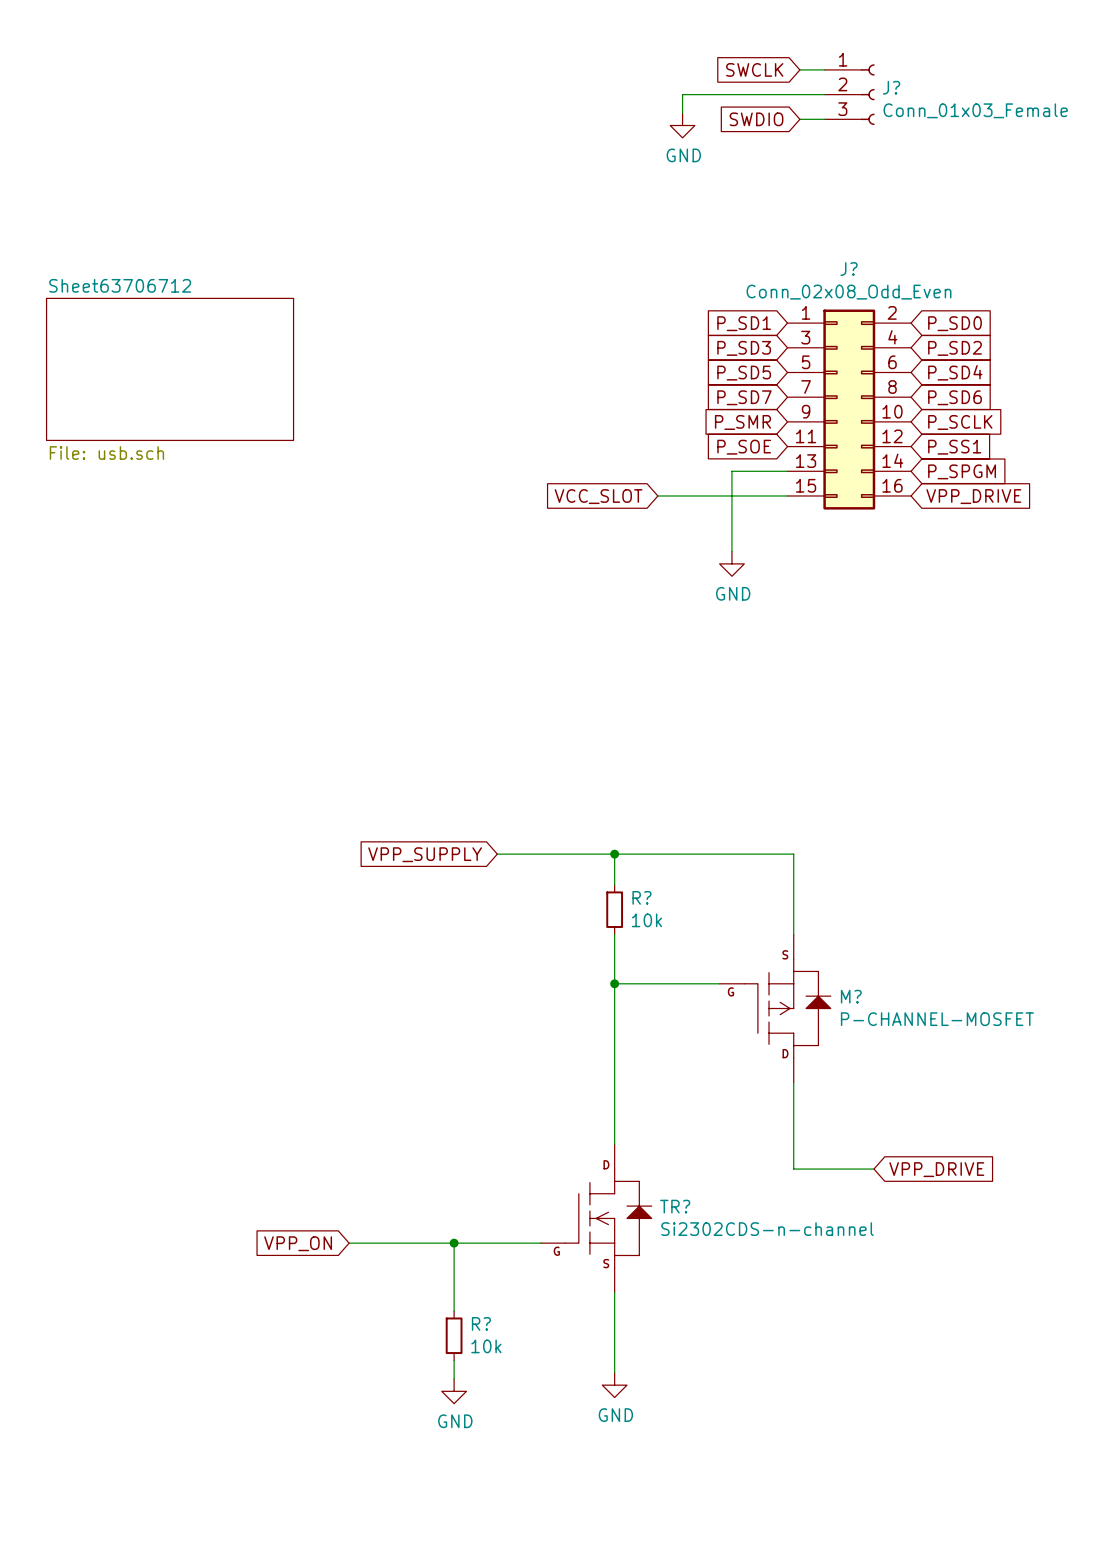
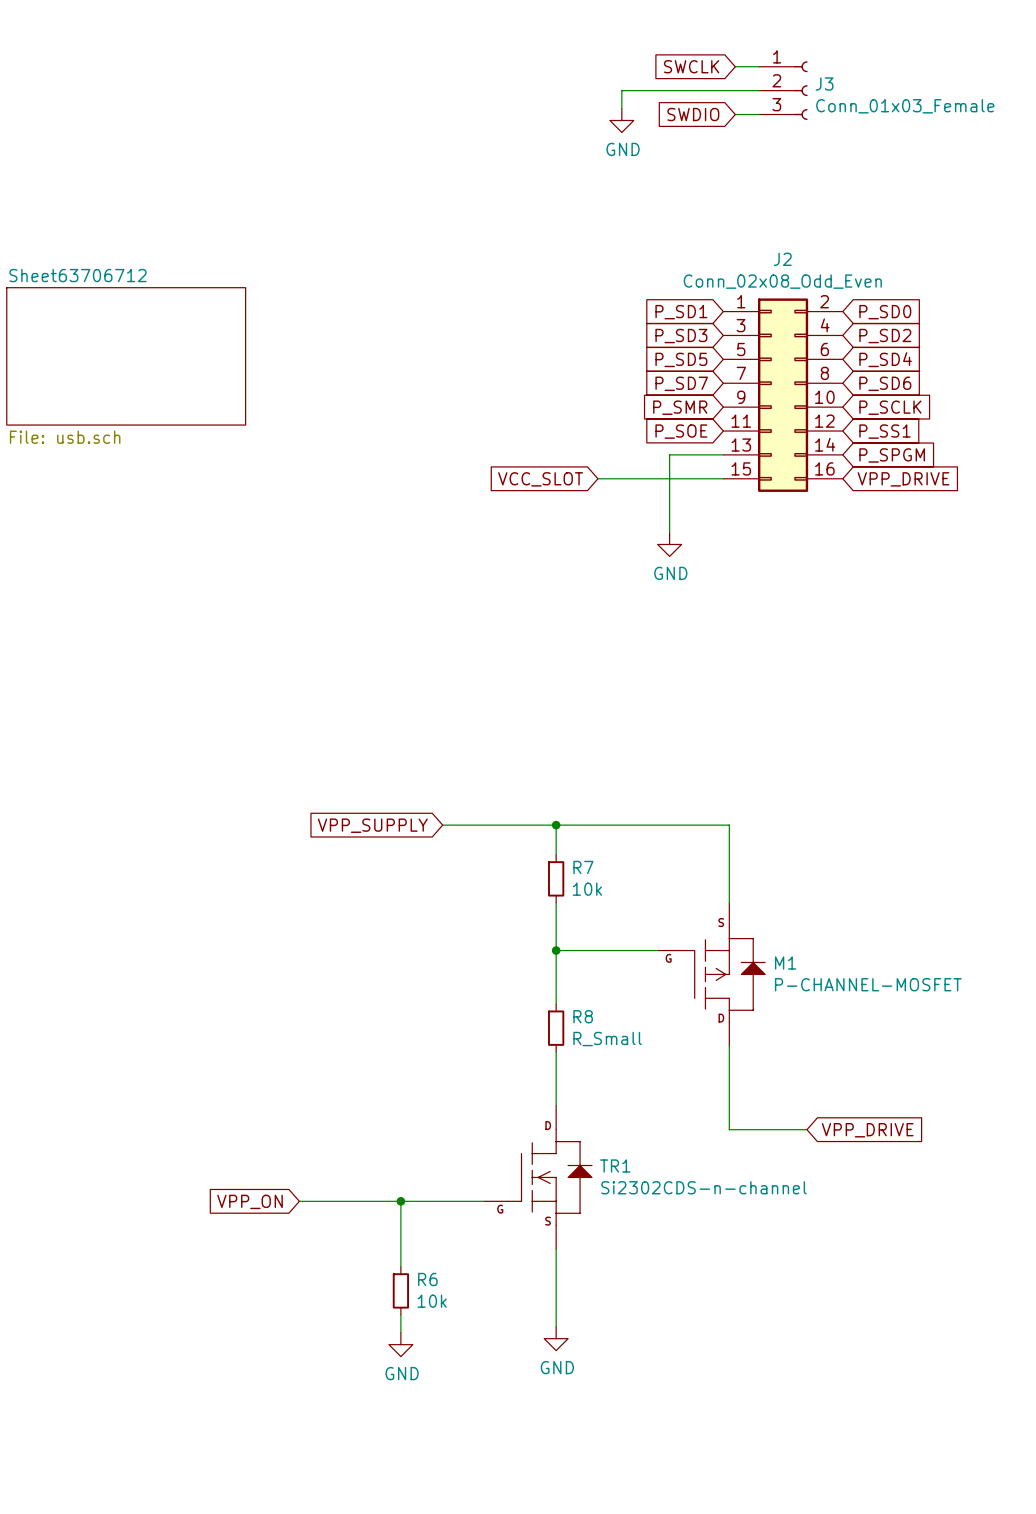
J? name: J? (891, 87) -> J3 (824, 83)
J? name: J? (848, 269) -> J2 (782, 259)
R? name: R? (641, 897) -> R7 (583, 867)
M? name: M? (851, 996) -> M1 (785, 962)
wire: (614, 1039) (614, 1088) -> none
R8: none -> R_Small (556, 1028)
TR? name: TR? (675, 1206) -> TR1 (615, 1166)
R? name: R? (481, 1323) -> R6 (427, 1279)

